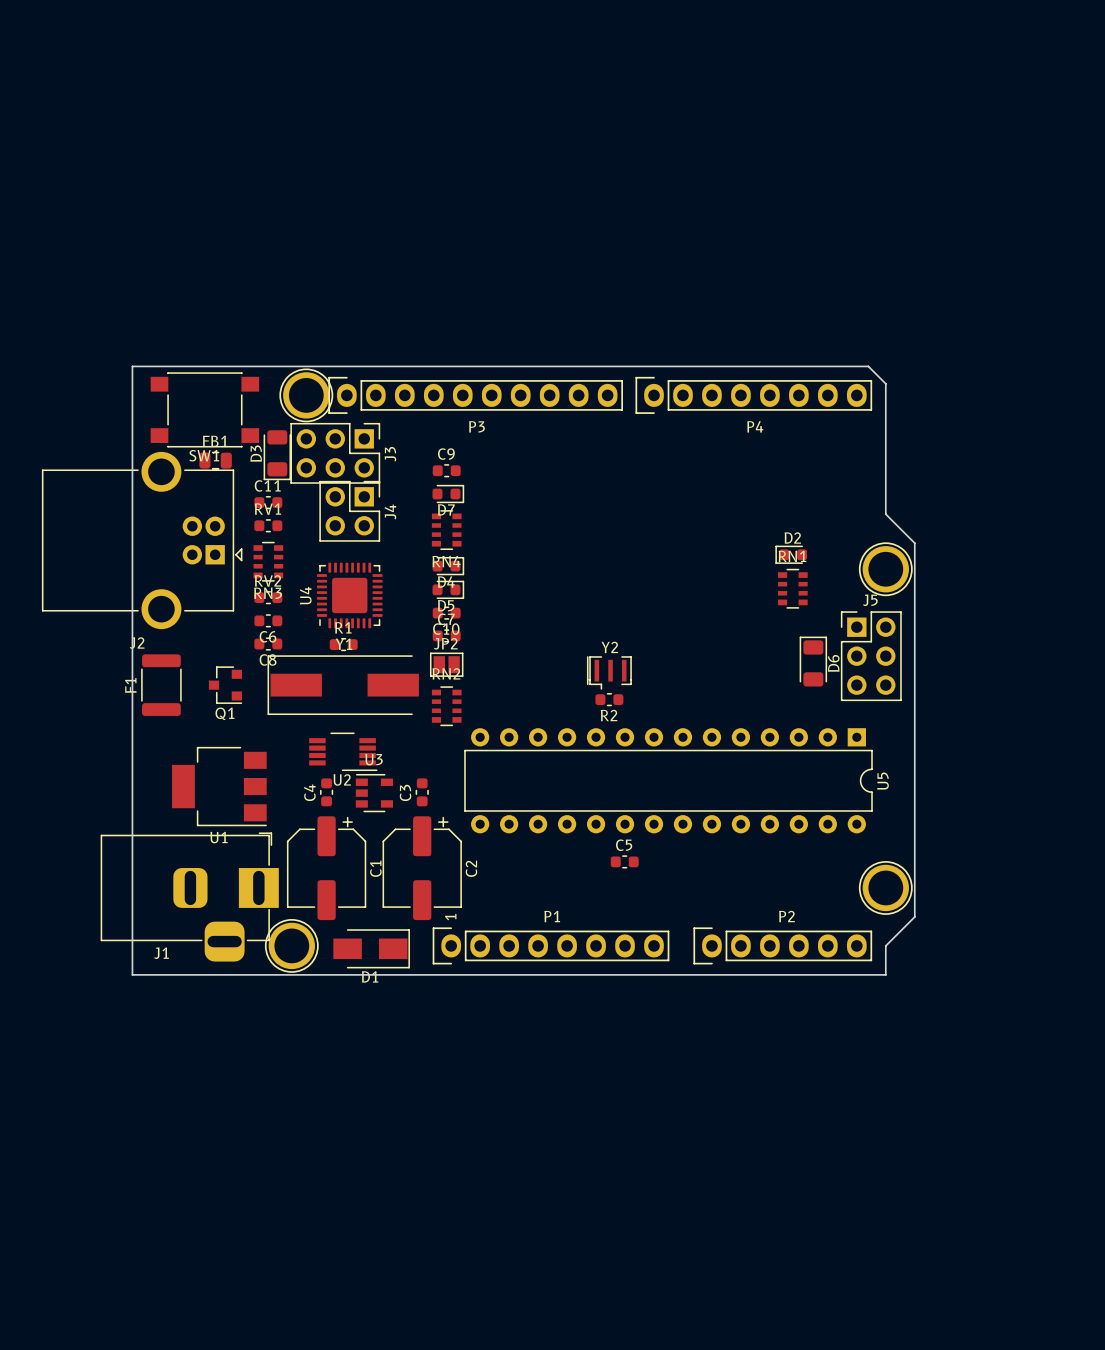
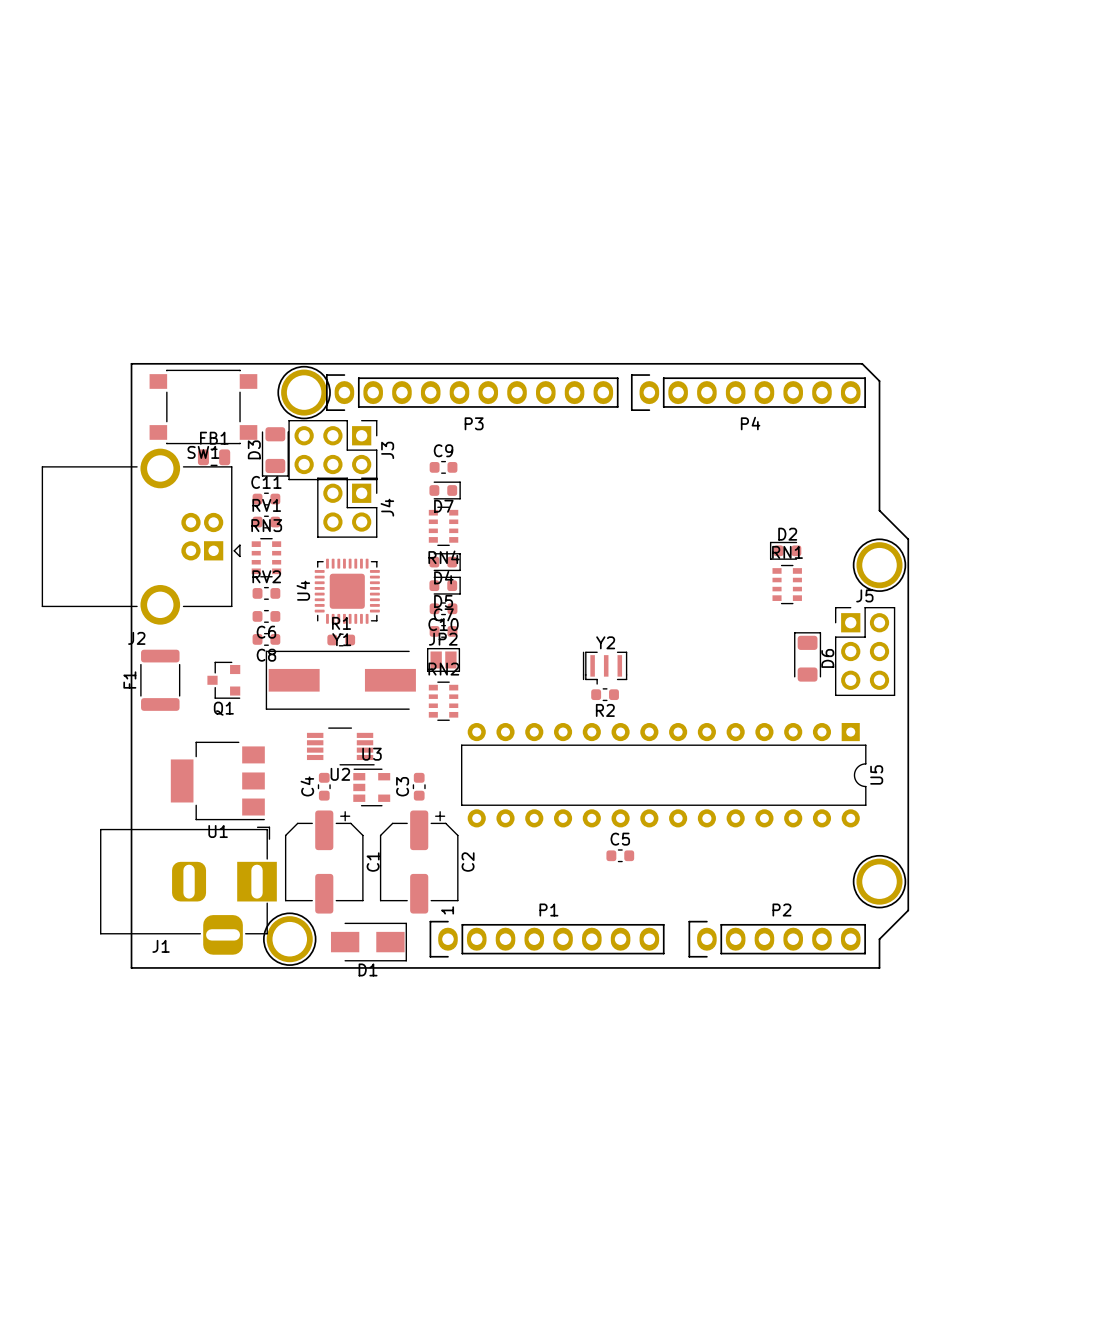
RN3 name position: RN3 (268, 593) -> RN3 (266, 525)

